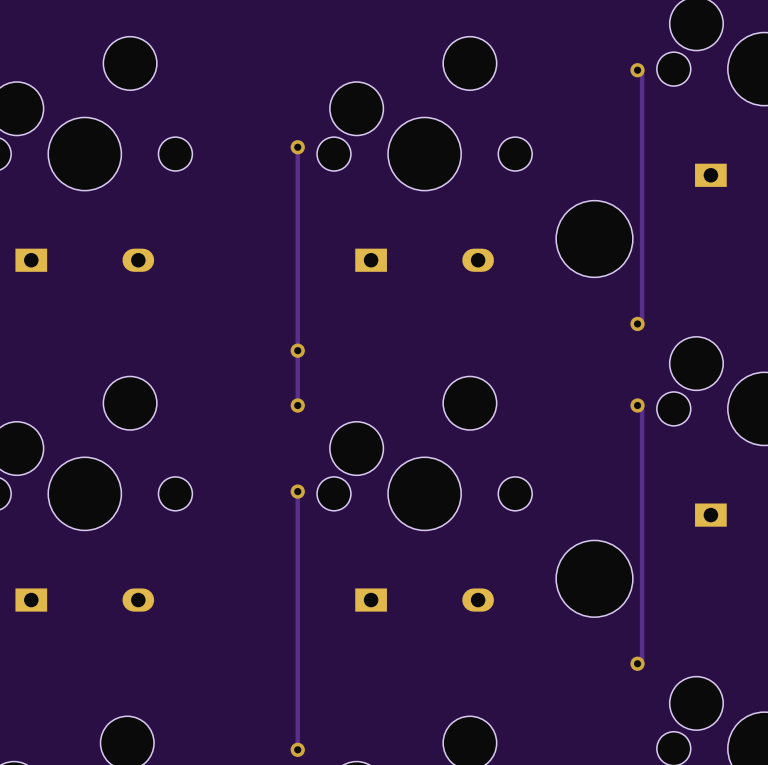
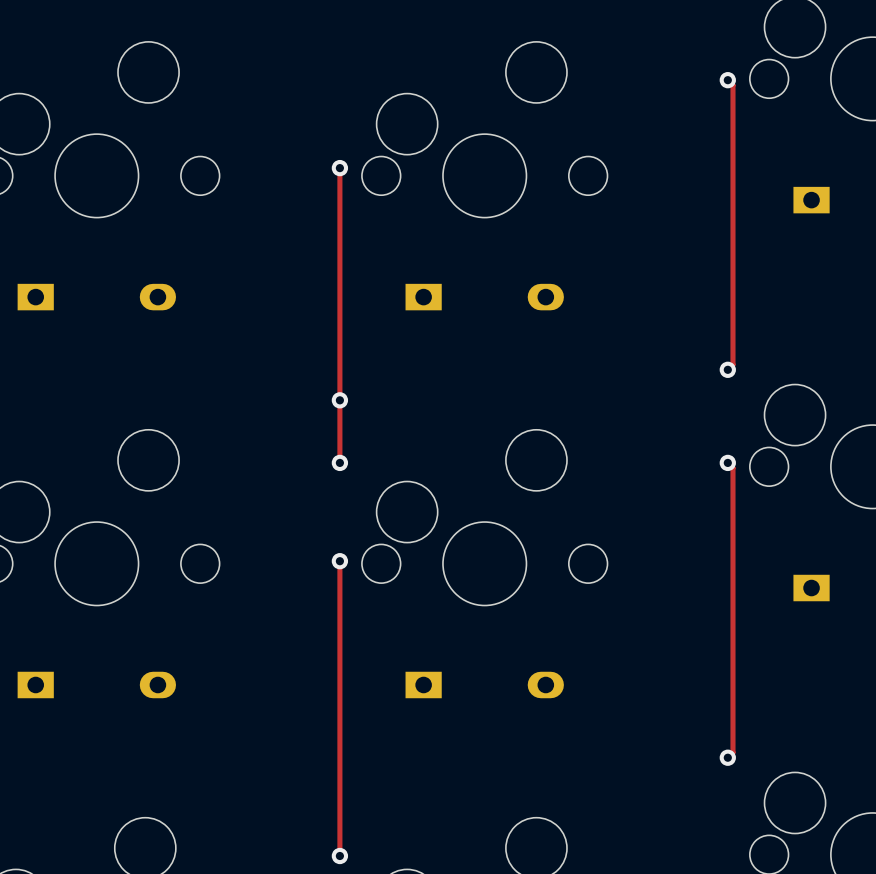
part: (594, 239) -> none
part: (594, 578) -> none

